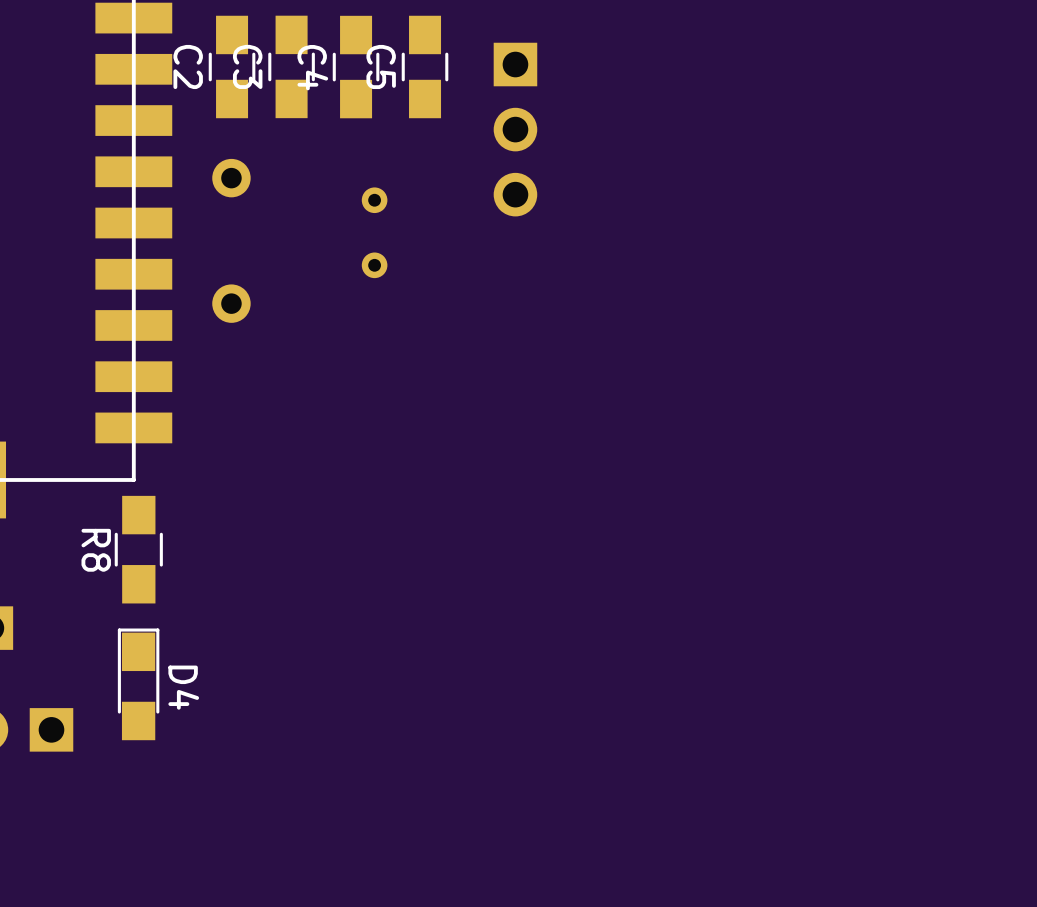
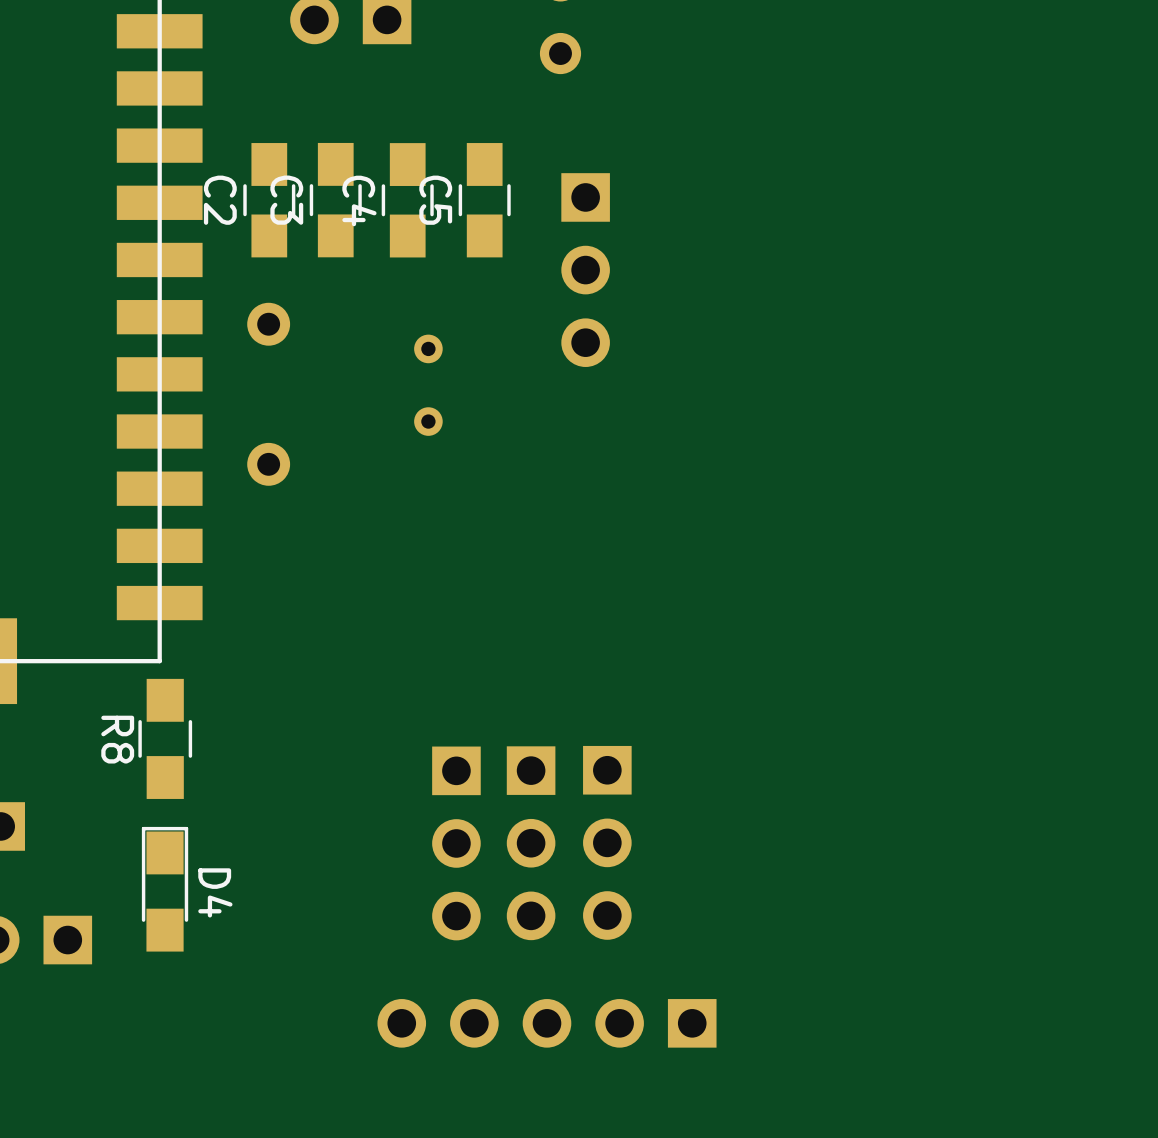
part: none -> (607, 842)
part: none -> (456, 843)
part: none -> (531, 843)
part: none -> (546, 1023)

